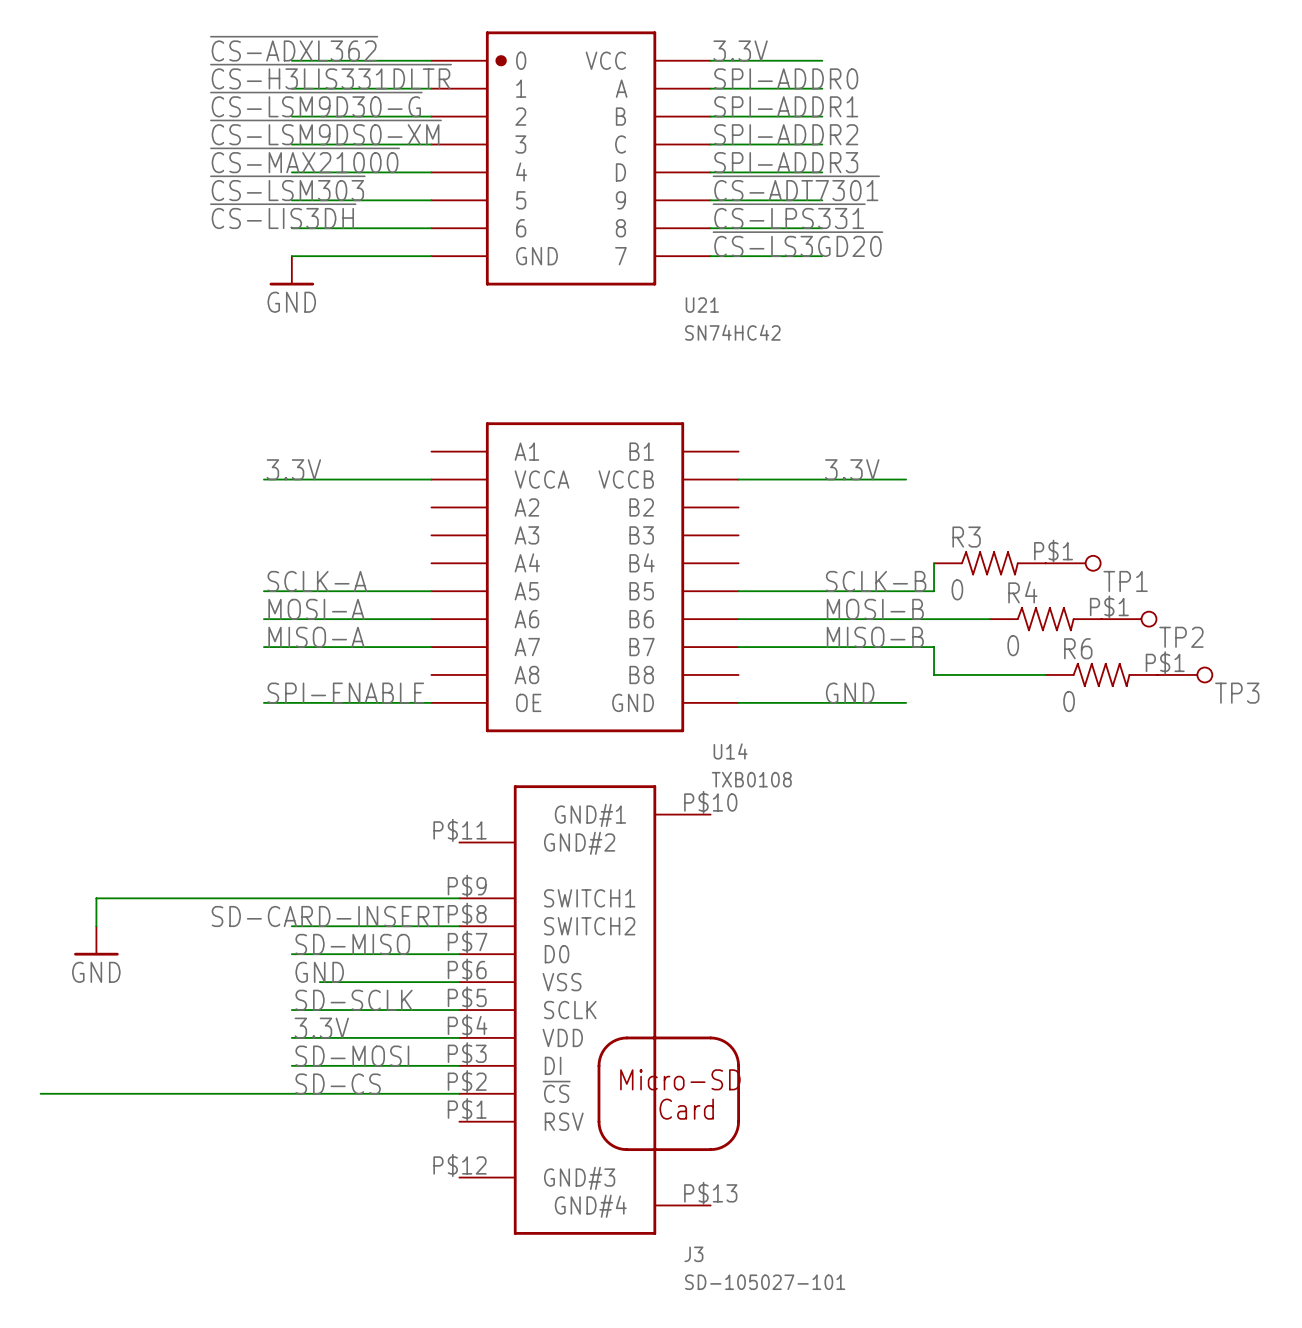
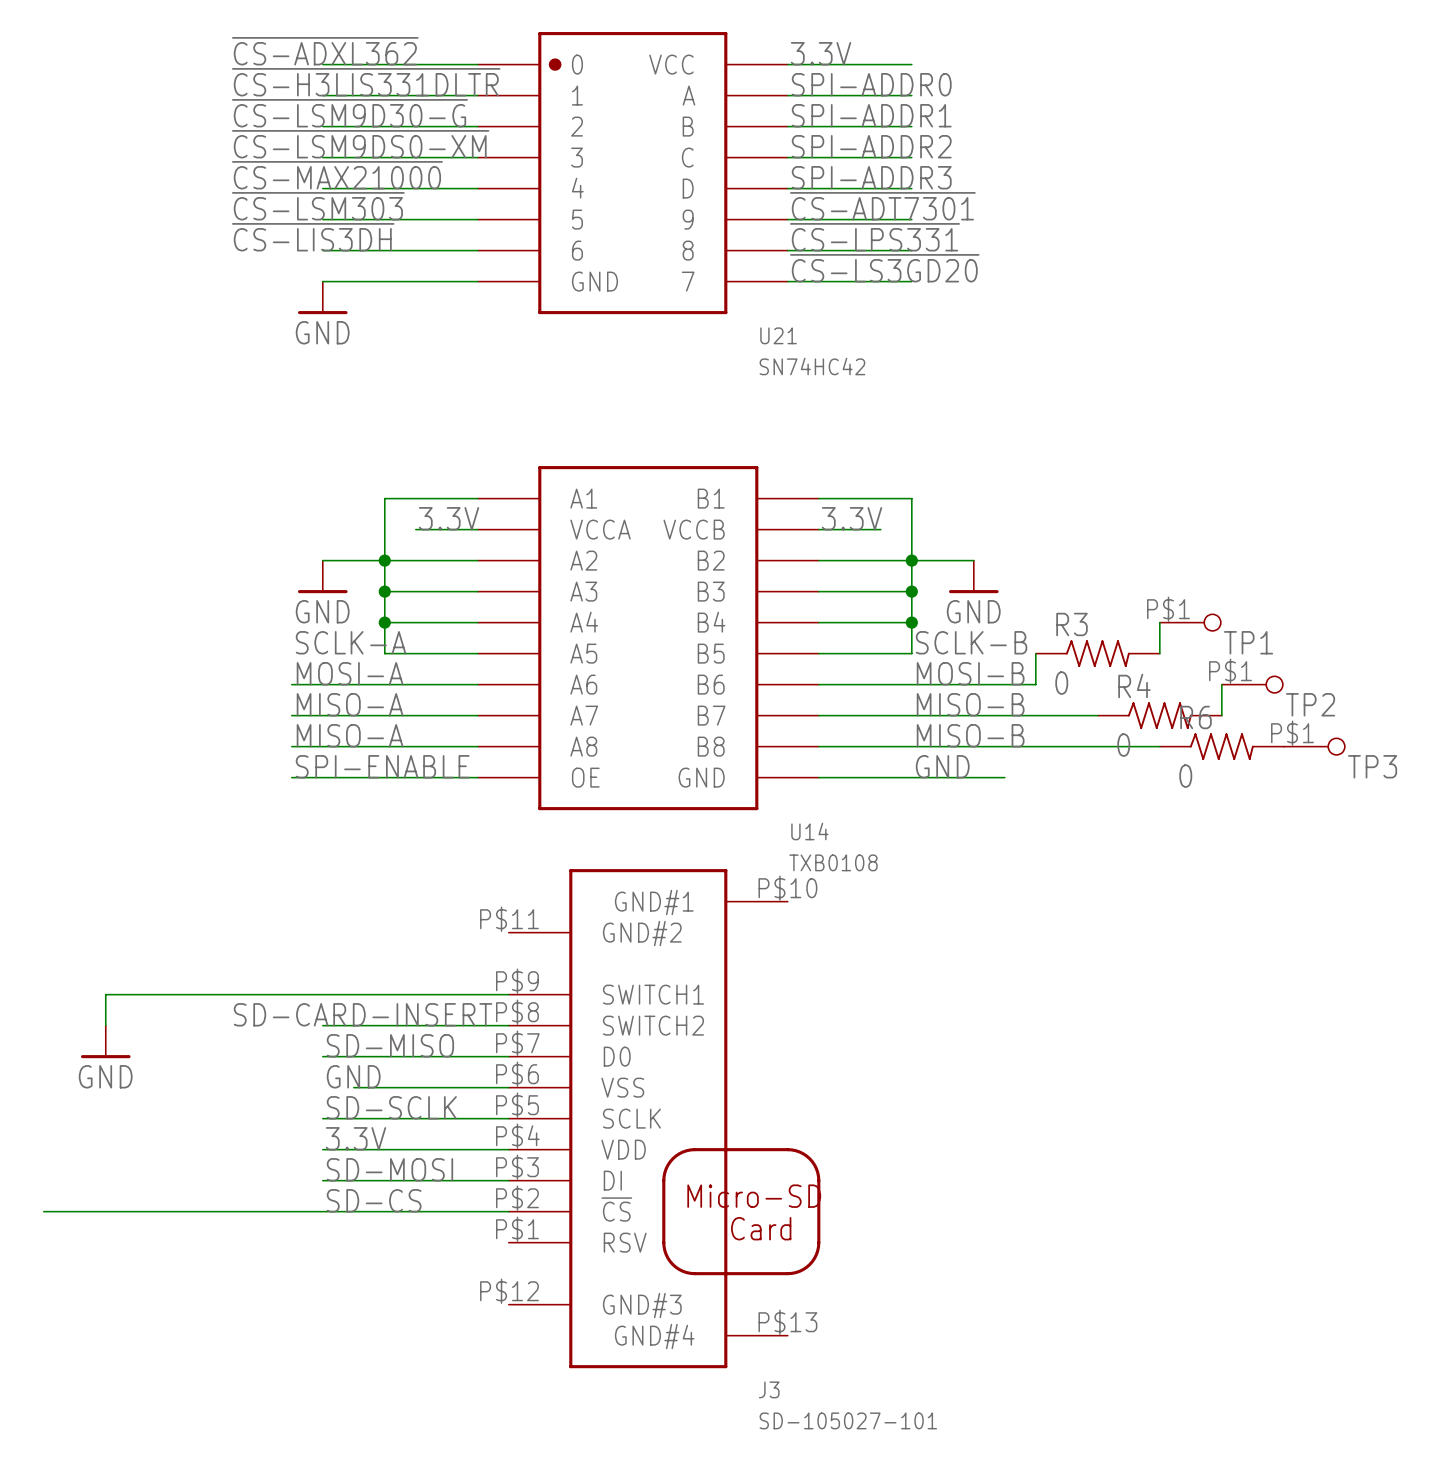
label position: 3.3V (293, 469) -> 3.3V (449, 518)
label position: 3.3V (852, 469) -> 3.3V (852, 518)
wire: (263, 479) (375, 479) -> none
wire: (794, 479) (906, 479) -> none
wire: none -> (322, 560) (477, 560)
junction: none -> (384, 560)
wire: none -> (818, 560) (973, 560)
junction: none -> (911, 560)
power symbol: none -> GND (322, 576)
power symbol: none -> GND (973, 576)
wire: none -> (384, 591) (477, 591)
junction: none -> (384, 591)
wire: none -> (818, 591) (911, 591)
junction: none -> (911, 591)
wire: none -> (384, 622) (477, 622)
junction: none -> (384, 622)
wire: none -> (818, 622) (911, 622)
junction: none -> (911, 622)
wire: (934, 563) (934, 591) (822, 591) -> (818, 498) (911, 498) (911, 653)
R3 position: (989, 563) -> (1097, 653)
wire: none -> (1159, 622) (1159, 653)
wire: (263, 591) (347, 591) -> (477, 498) (384, 498) (384, 653)
wire: (934, 619) (989, 619) -> (1035, 684) (1035, 653)
R4 position: (1045, 619) -> (1159, 715)
wire: none -> (1221, 684) (1221, 715)
wire: (934, 647) (934, 674) -> (1035, 715) (1097, 715)
label: none -> MISO-A (350, 735)
label: none -> MISO-B (970, 735)
wire: none -> (291, 746) (477, 746)
wire: none -> (818, 746) (1035, 746)

